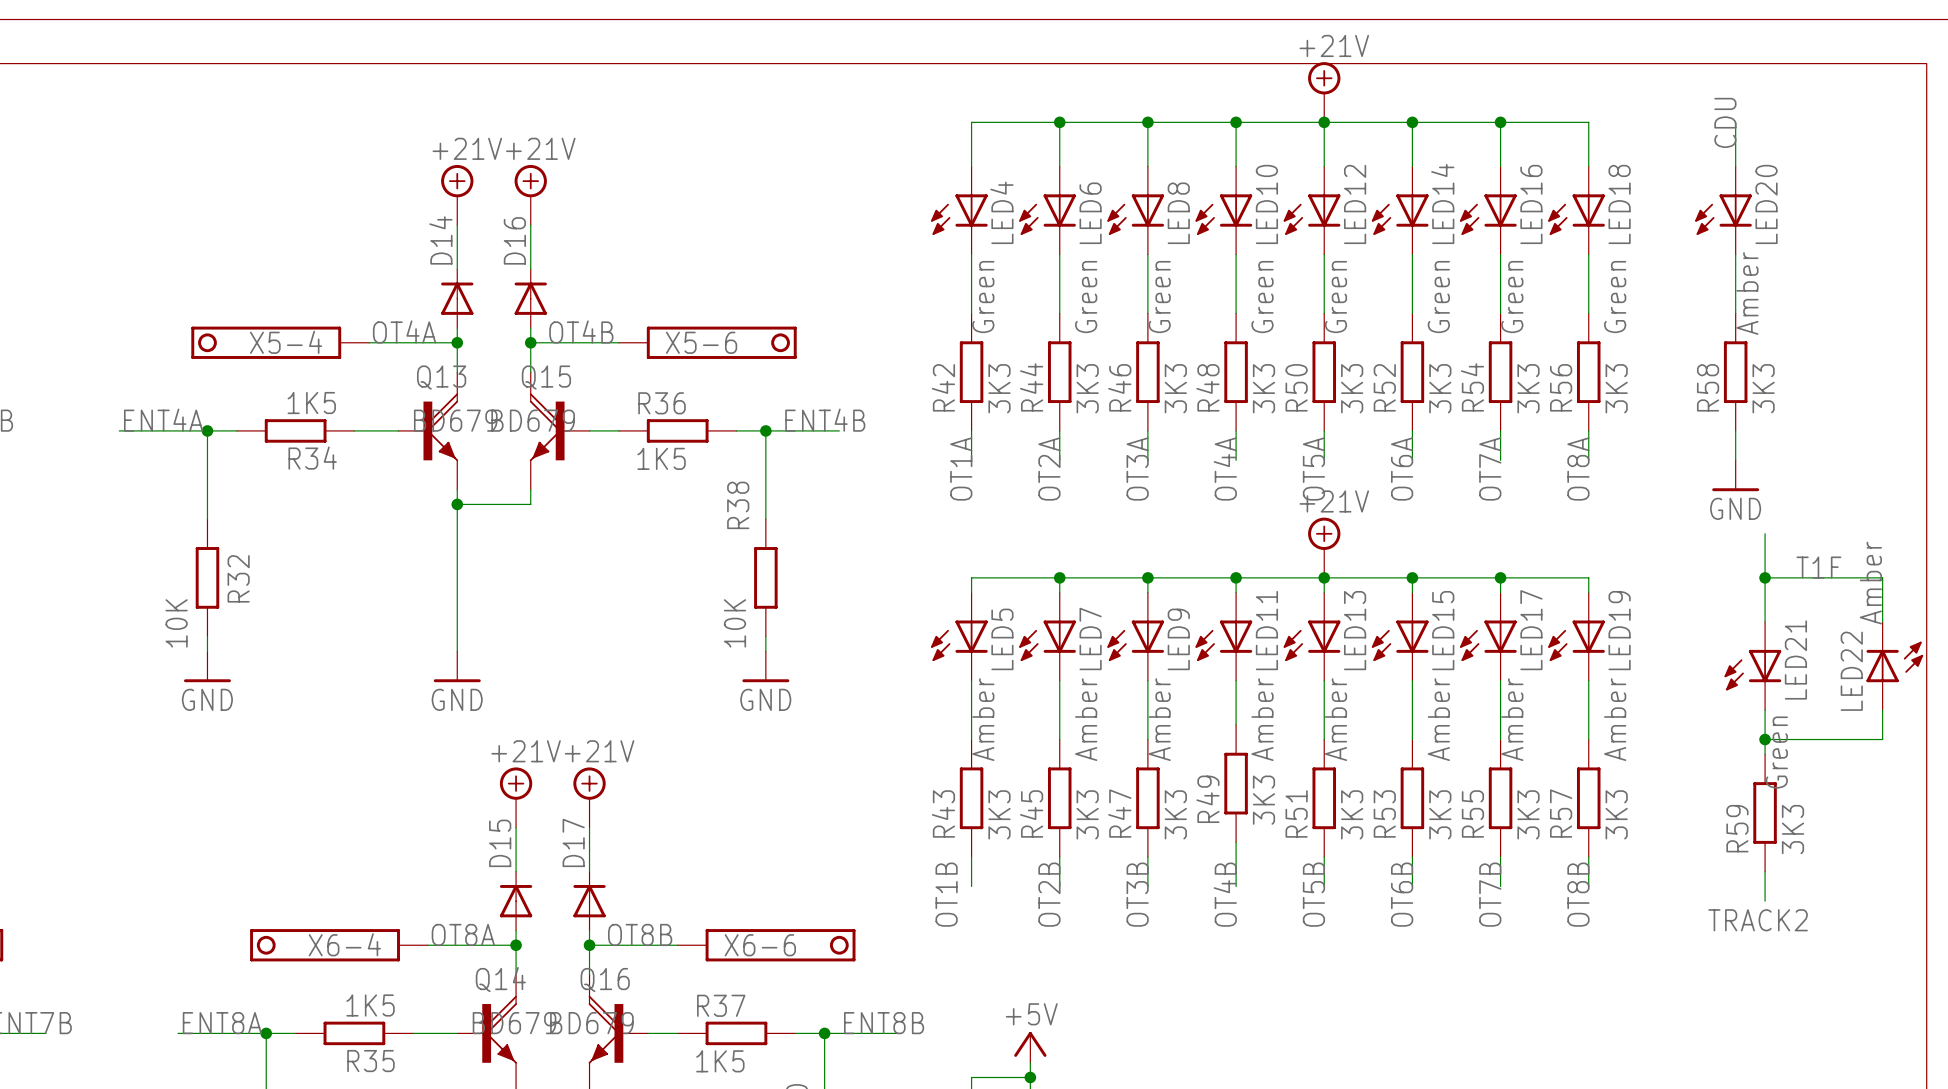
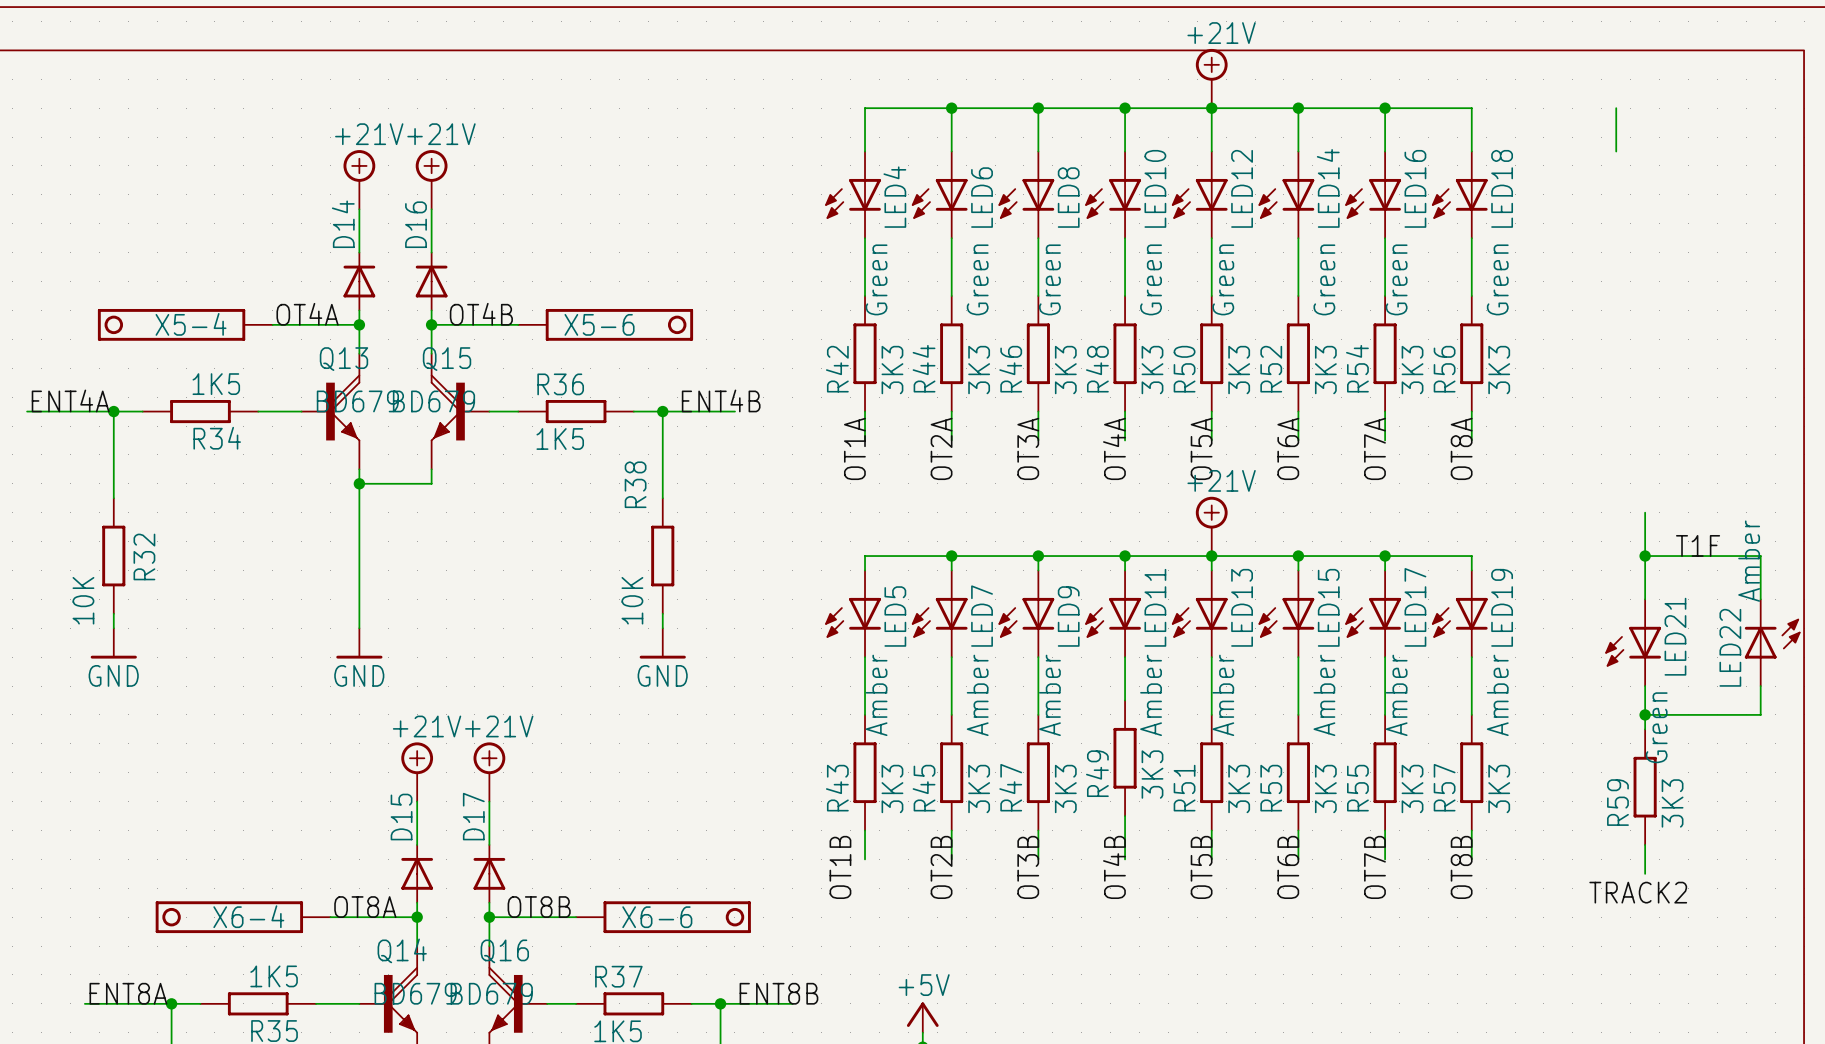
label: CDU (1725, 122) -> none
LED20: Amber (1723, 210) -> none
wire: (1735, 254) (1735, 313) -> none
R58: 3K3 (1735, 372) -> none
wire: (1735, 430) (1735, 460) -> none
power symbol: GND (1735, 475) -> none

